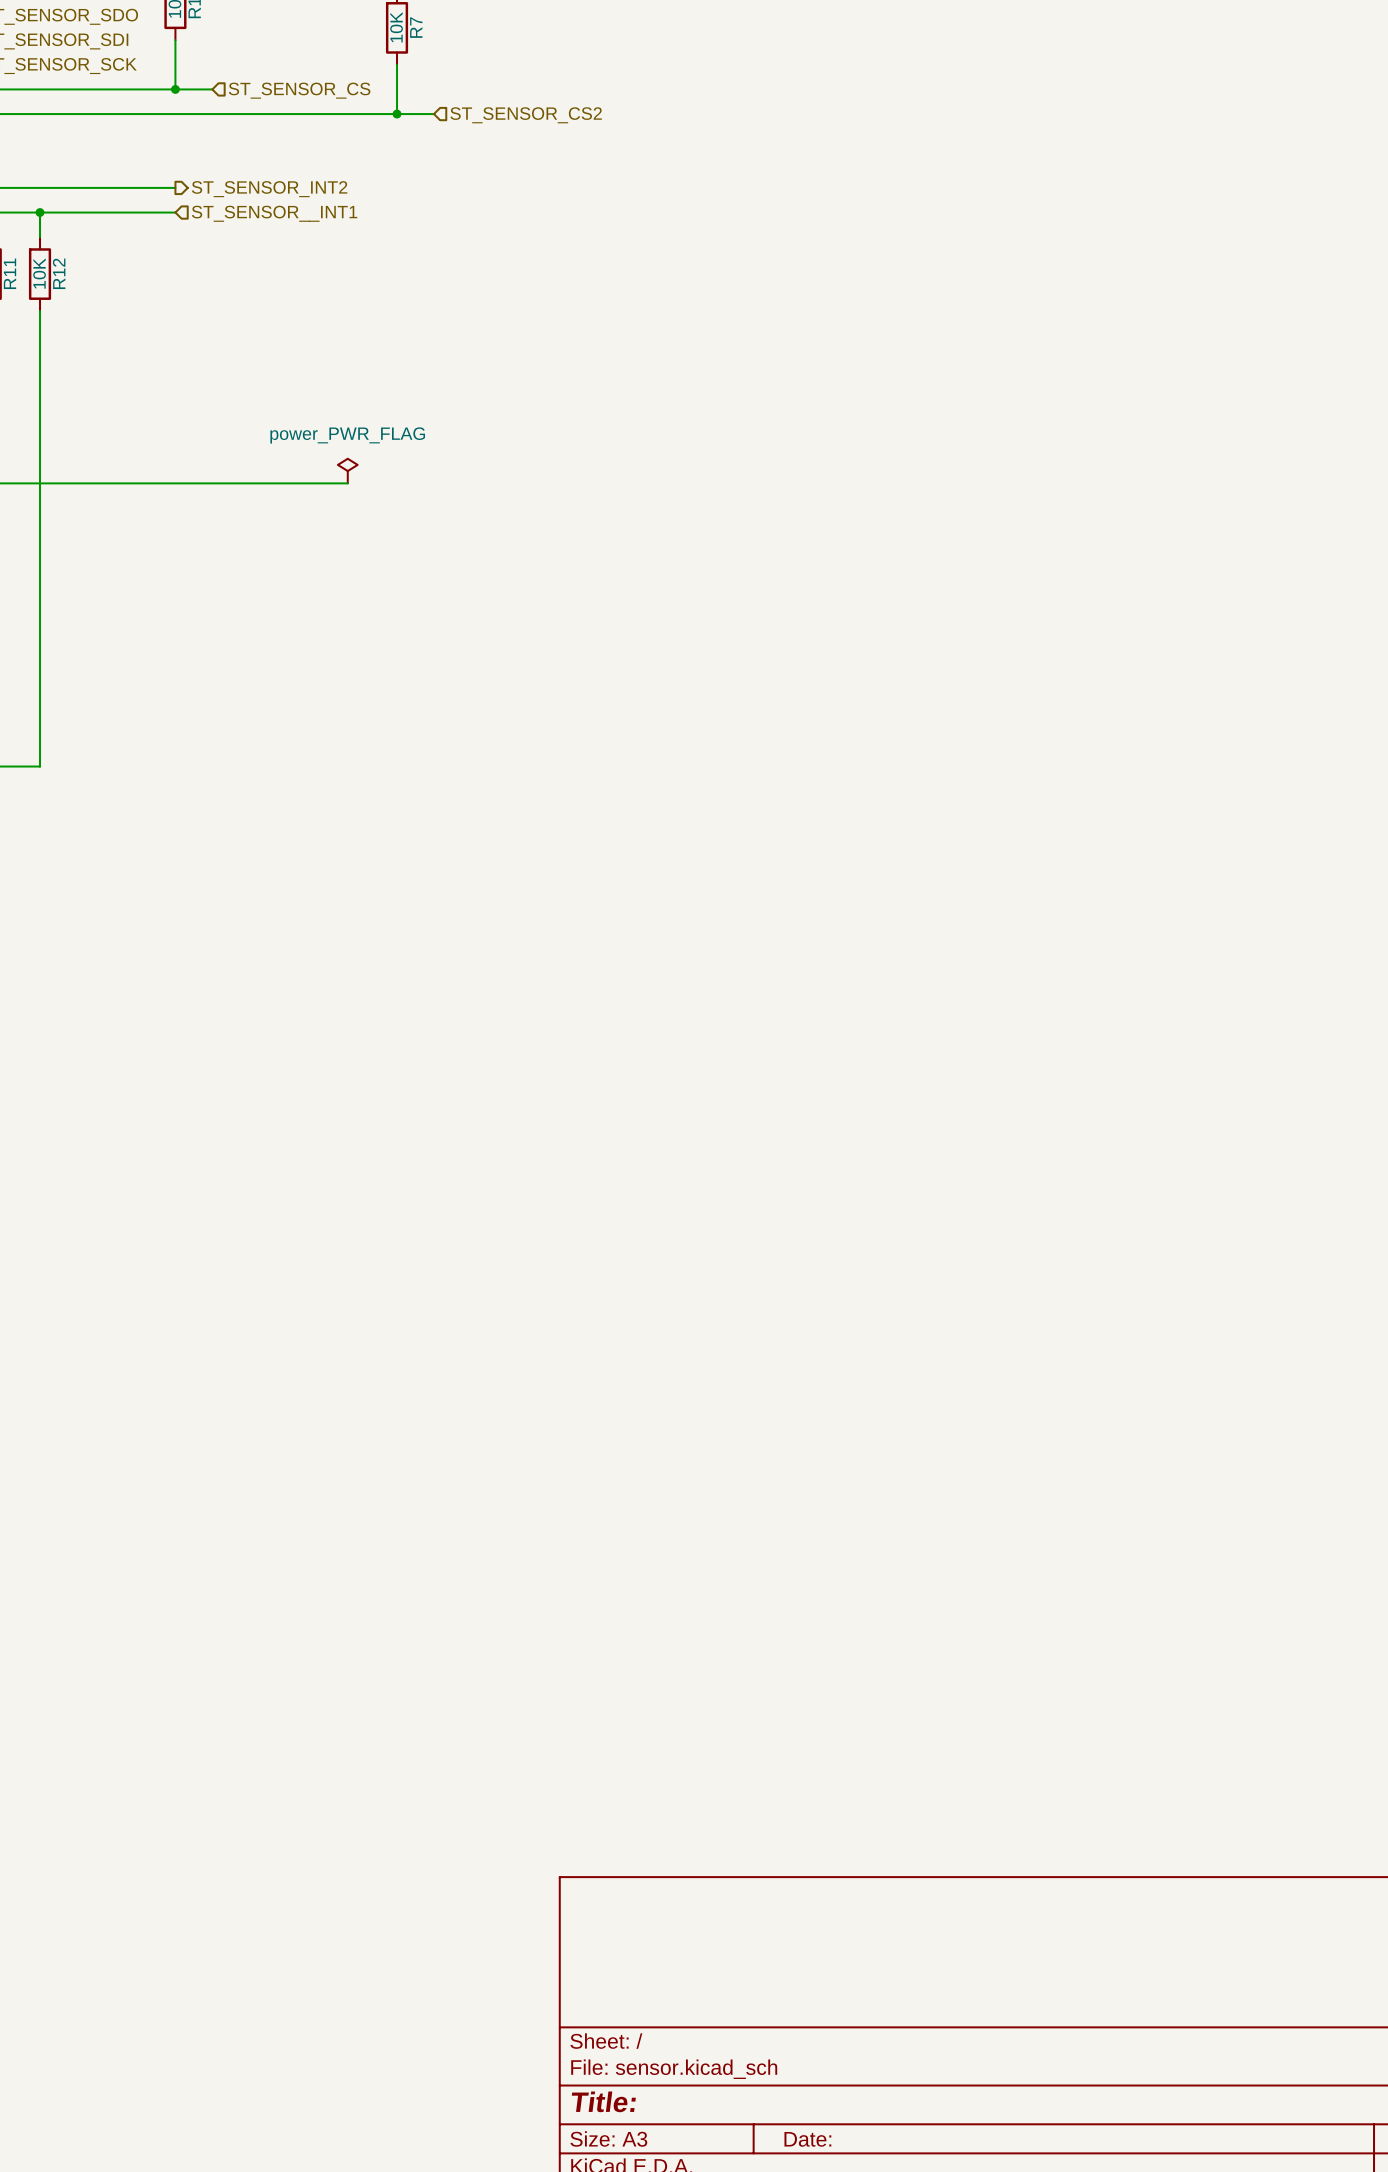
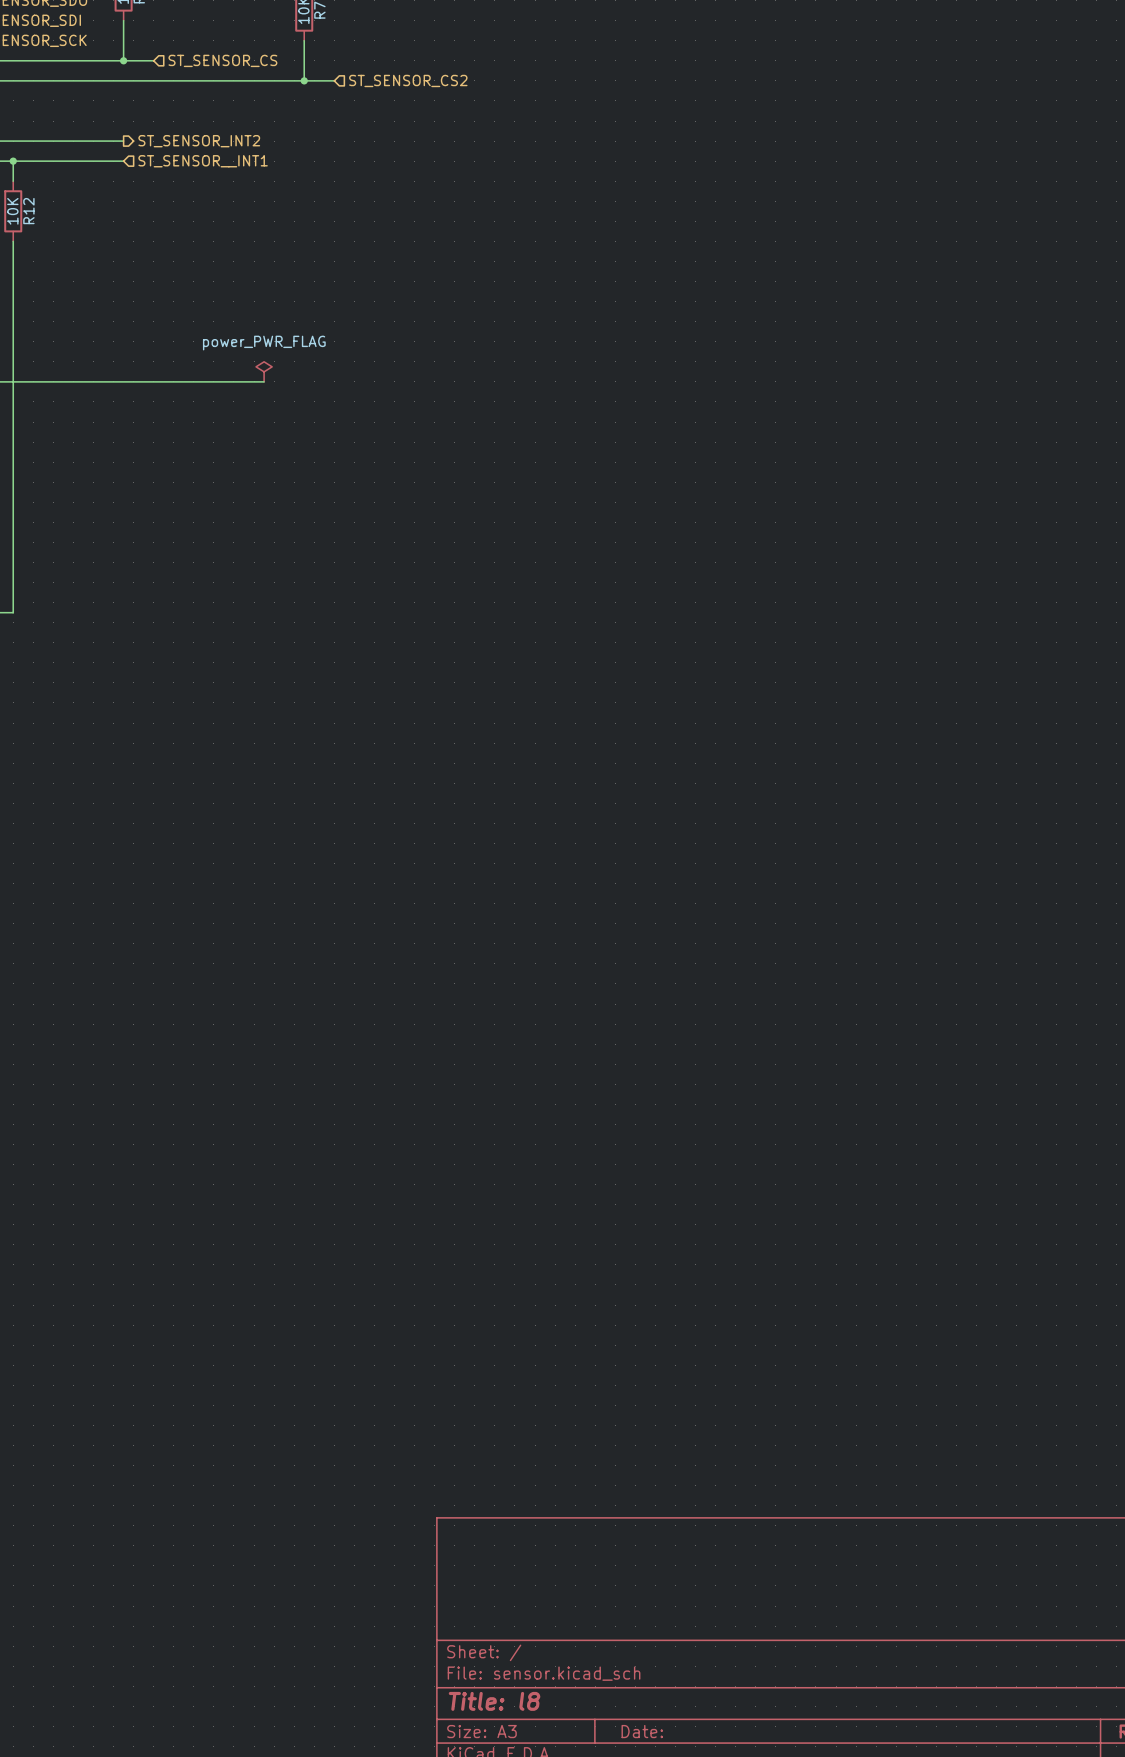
title block: Title: (603, 2101) -> Title: l8 (494, 1701)

